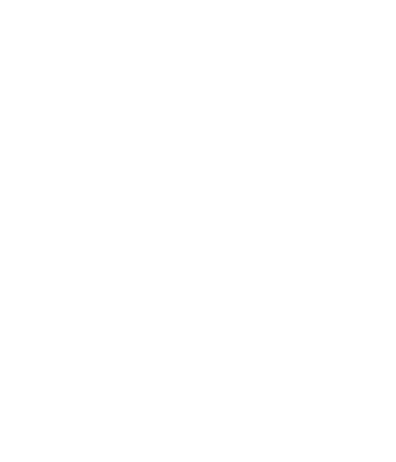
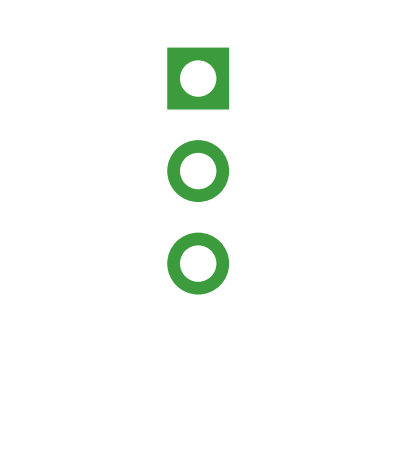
part: none -> (198, 171)

